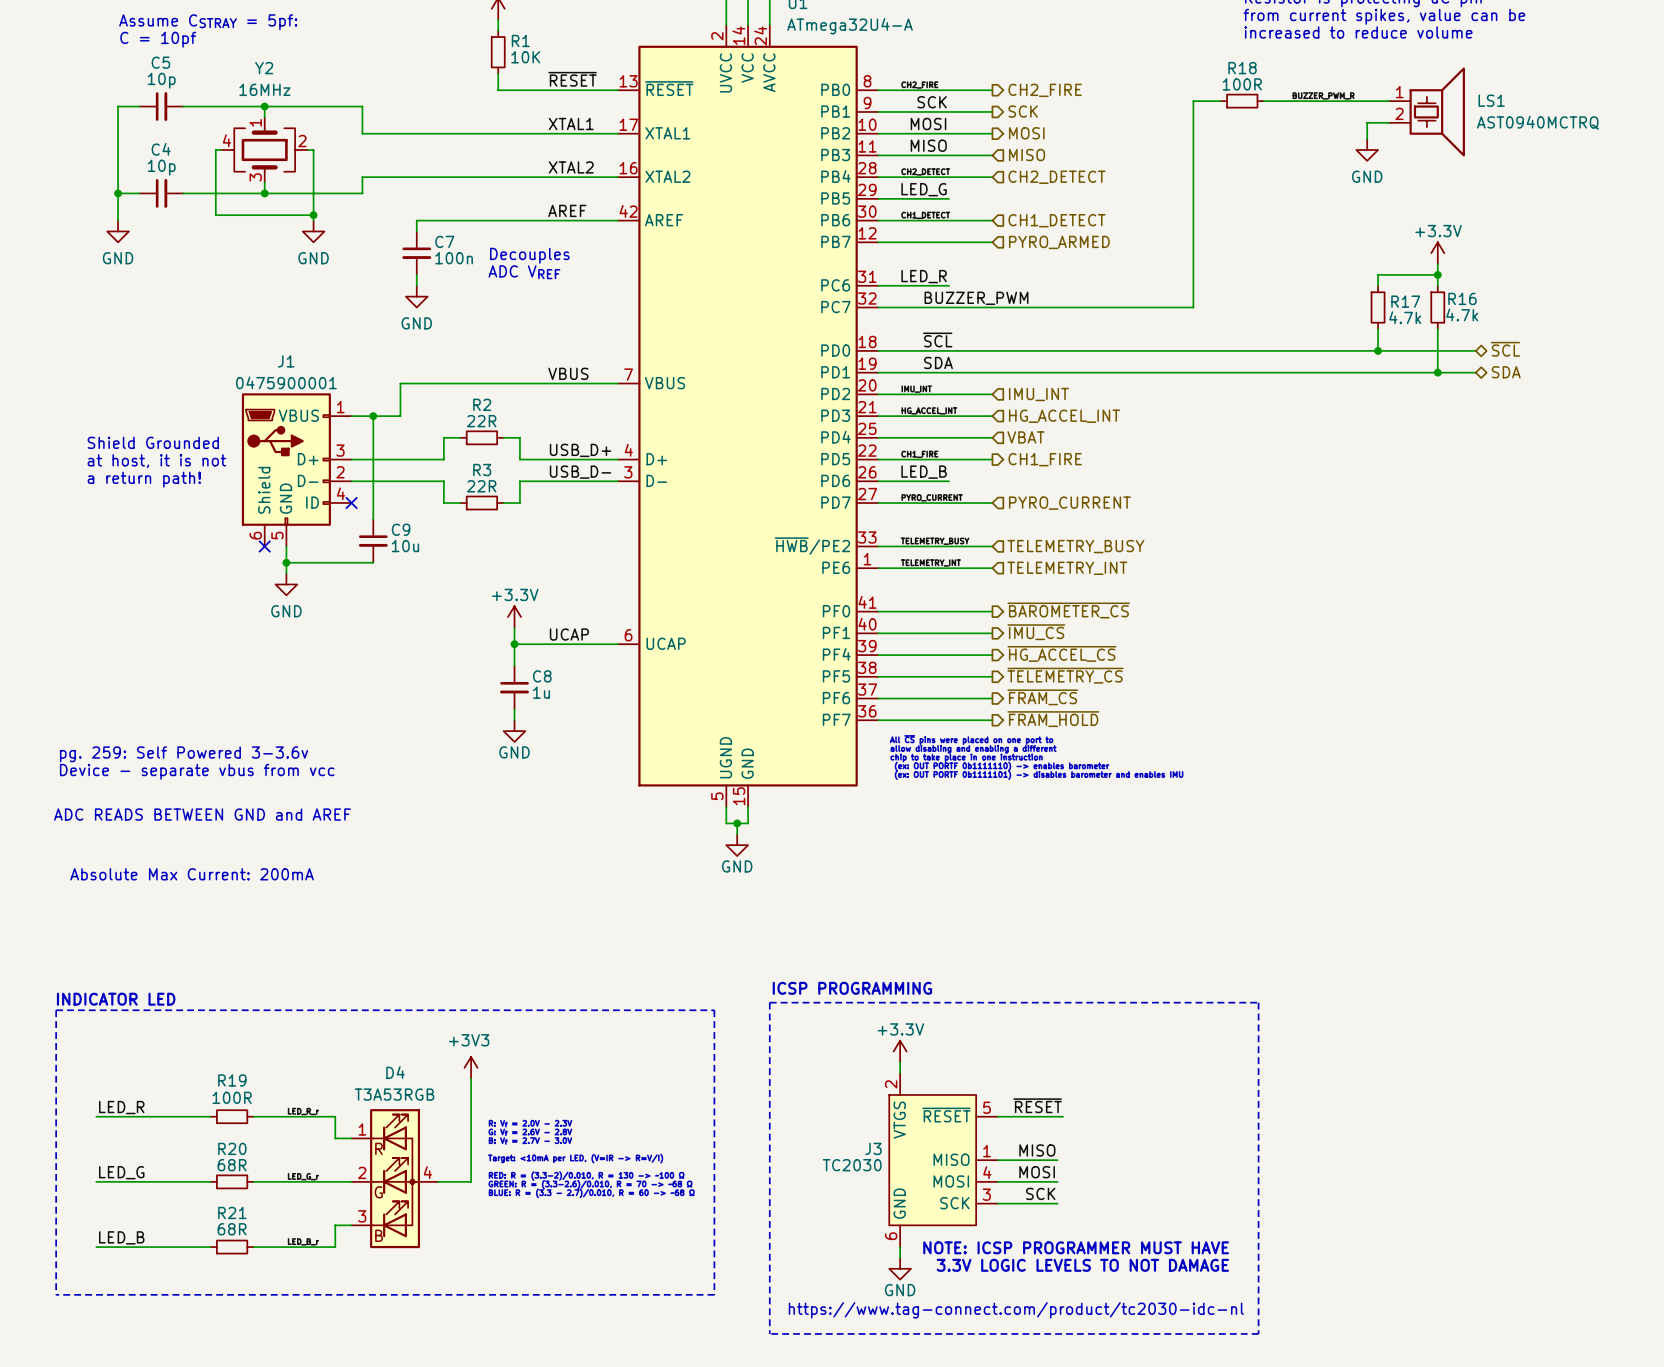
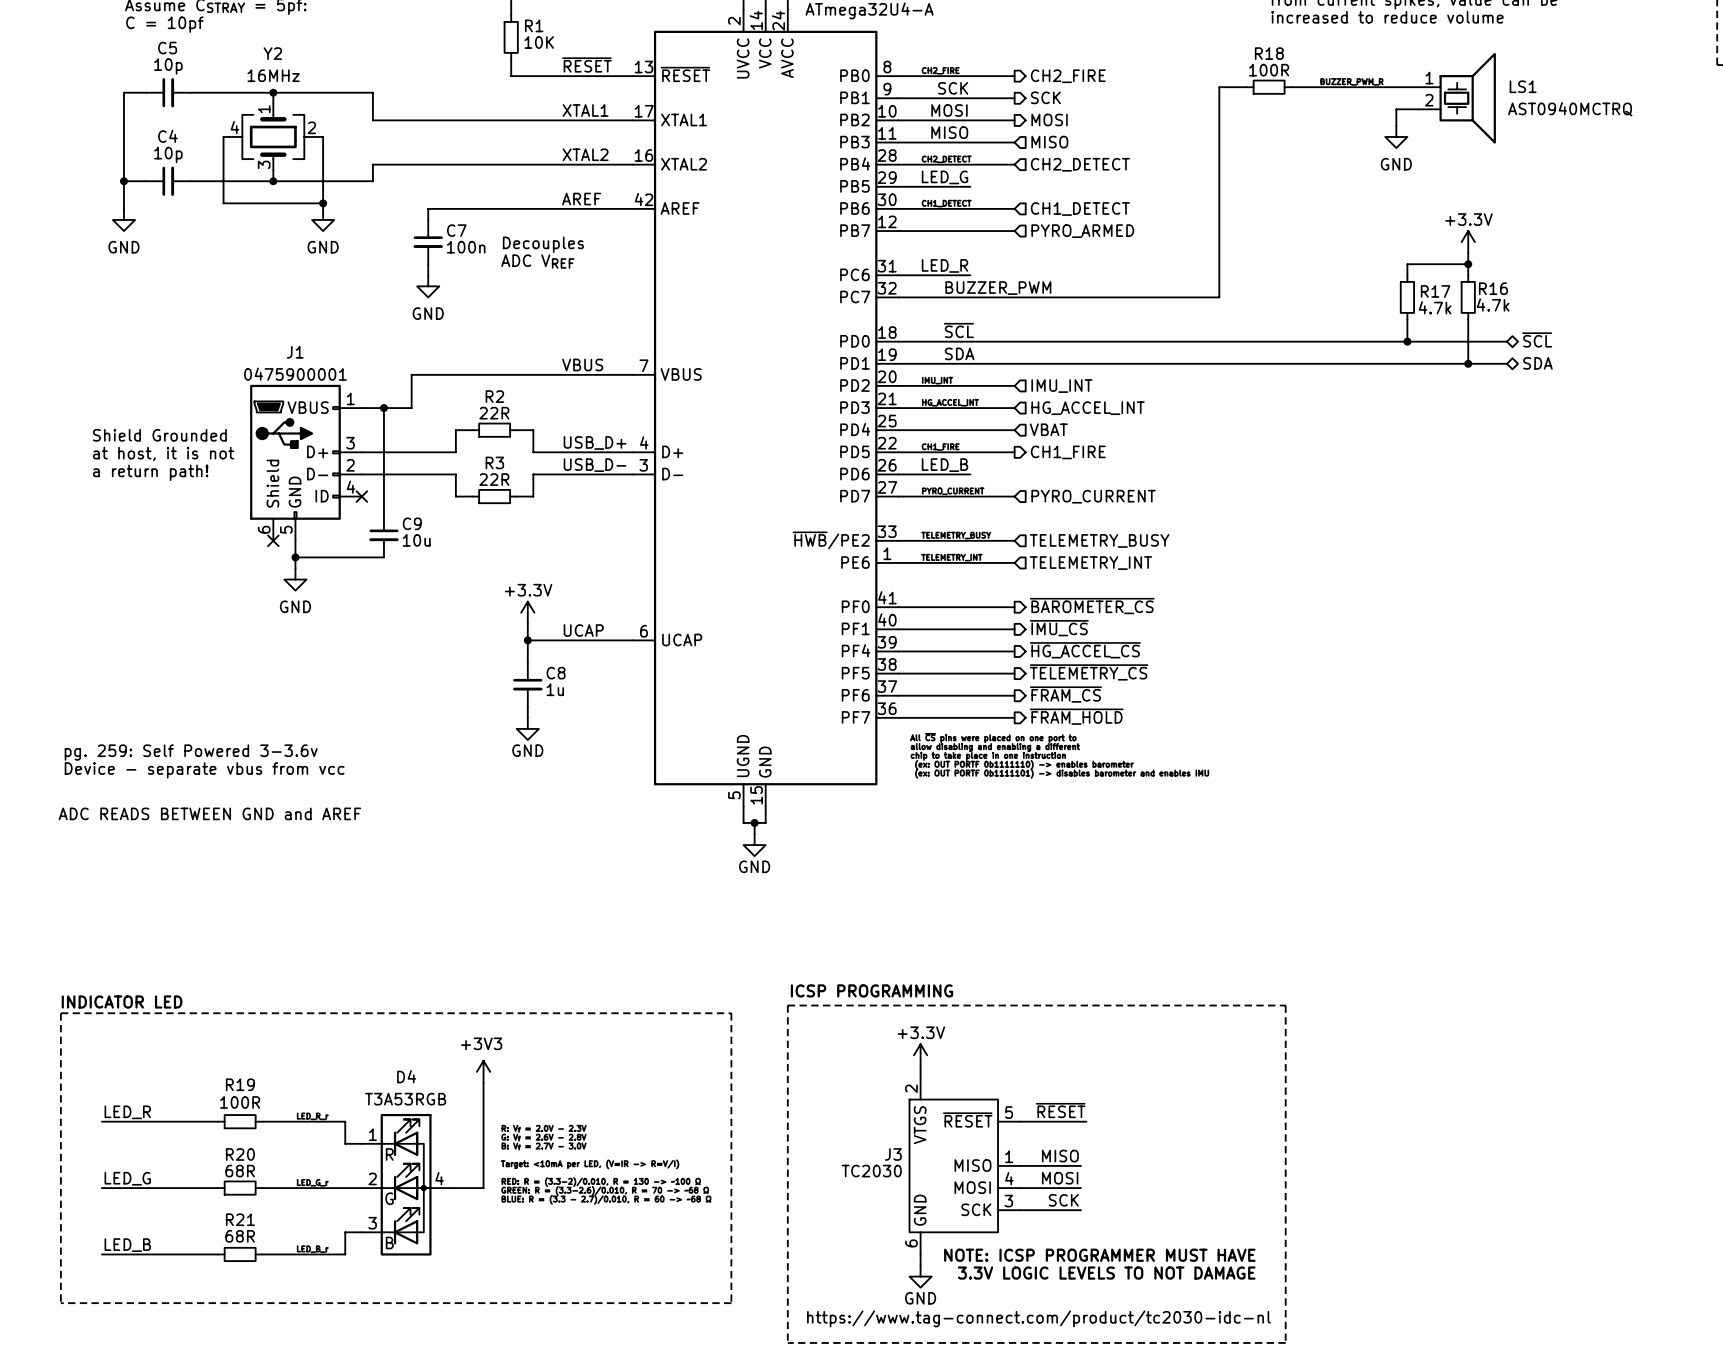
text: Absolute Max Current: 200mA (192, 874) -> none

